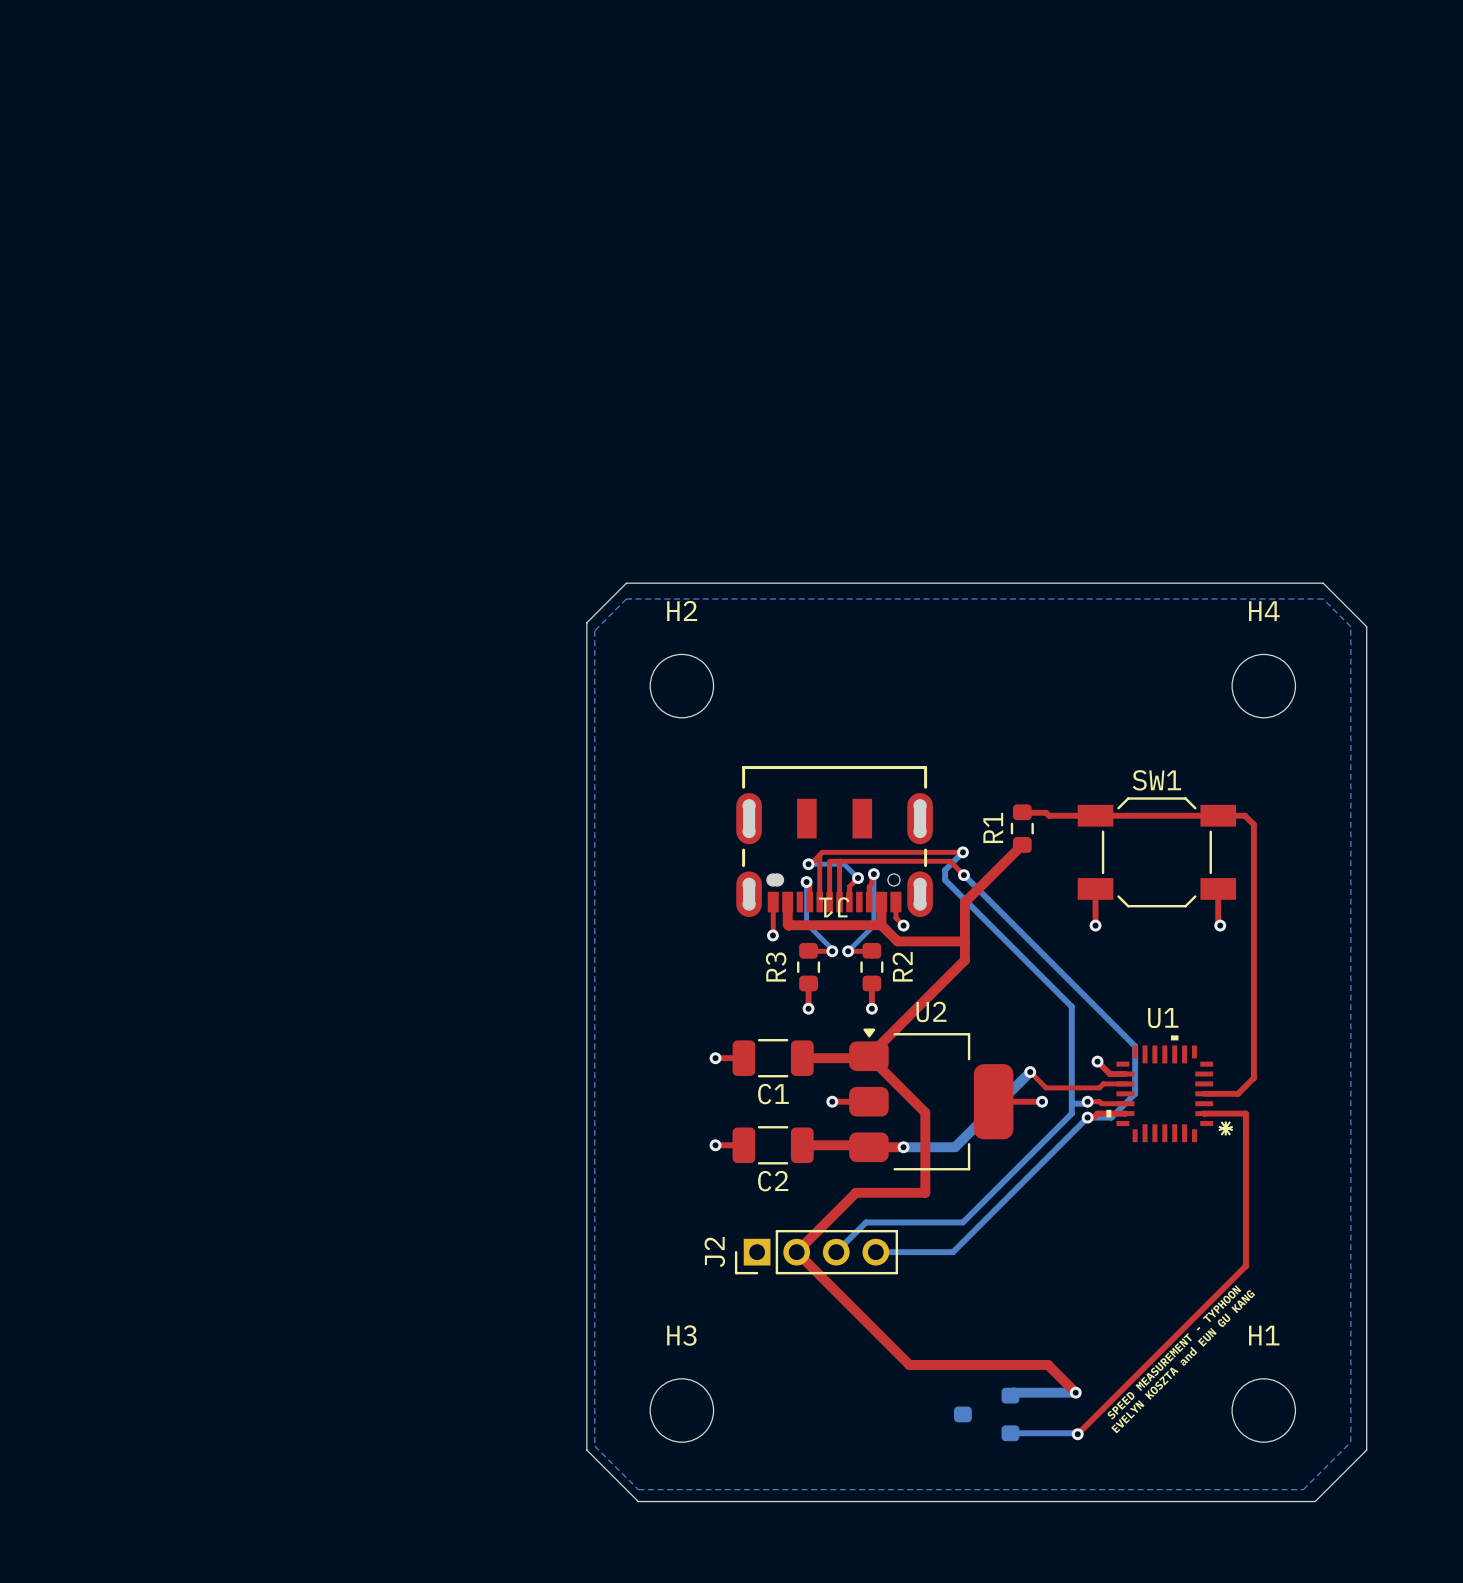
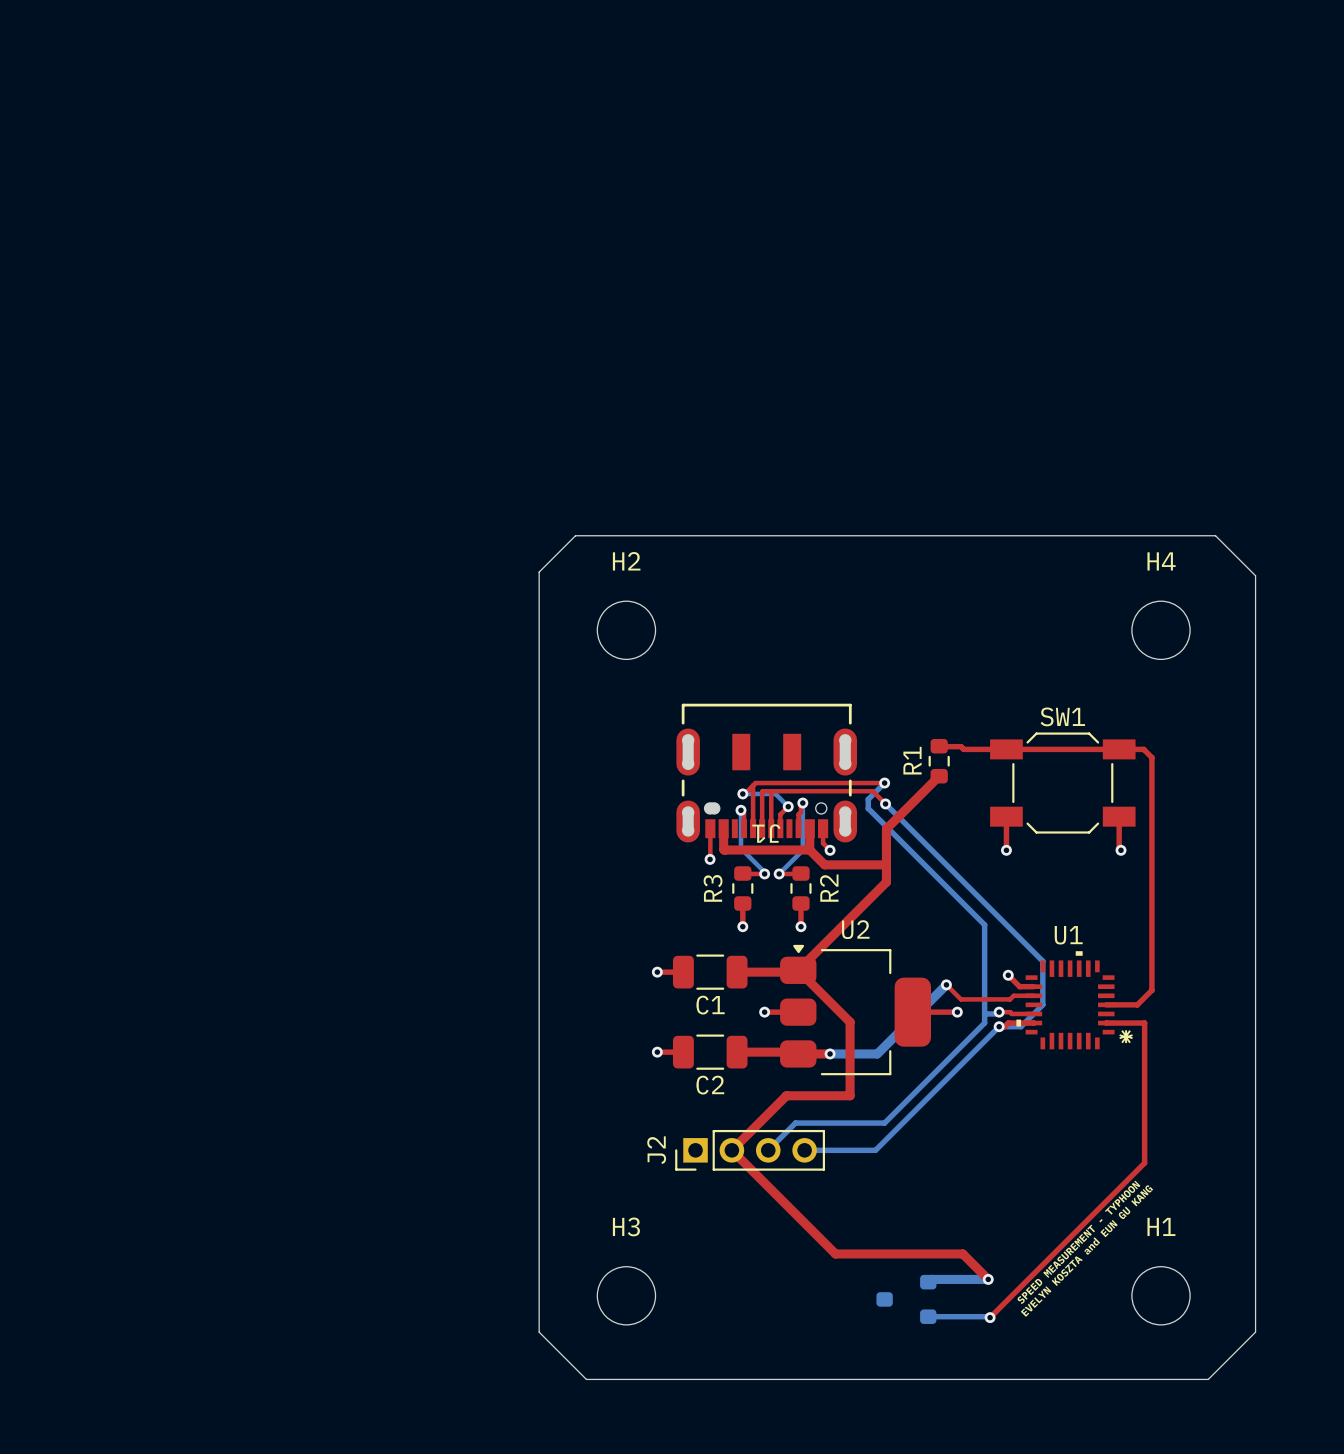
bottom zone outline: (626, 599) (1323, 599) (1350, 626) (1350, 1442) (1303, 1489) (638, 1489) (594, 1446) (594, 630) (626, 599) -> none

